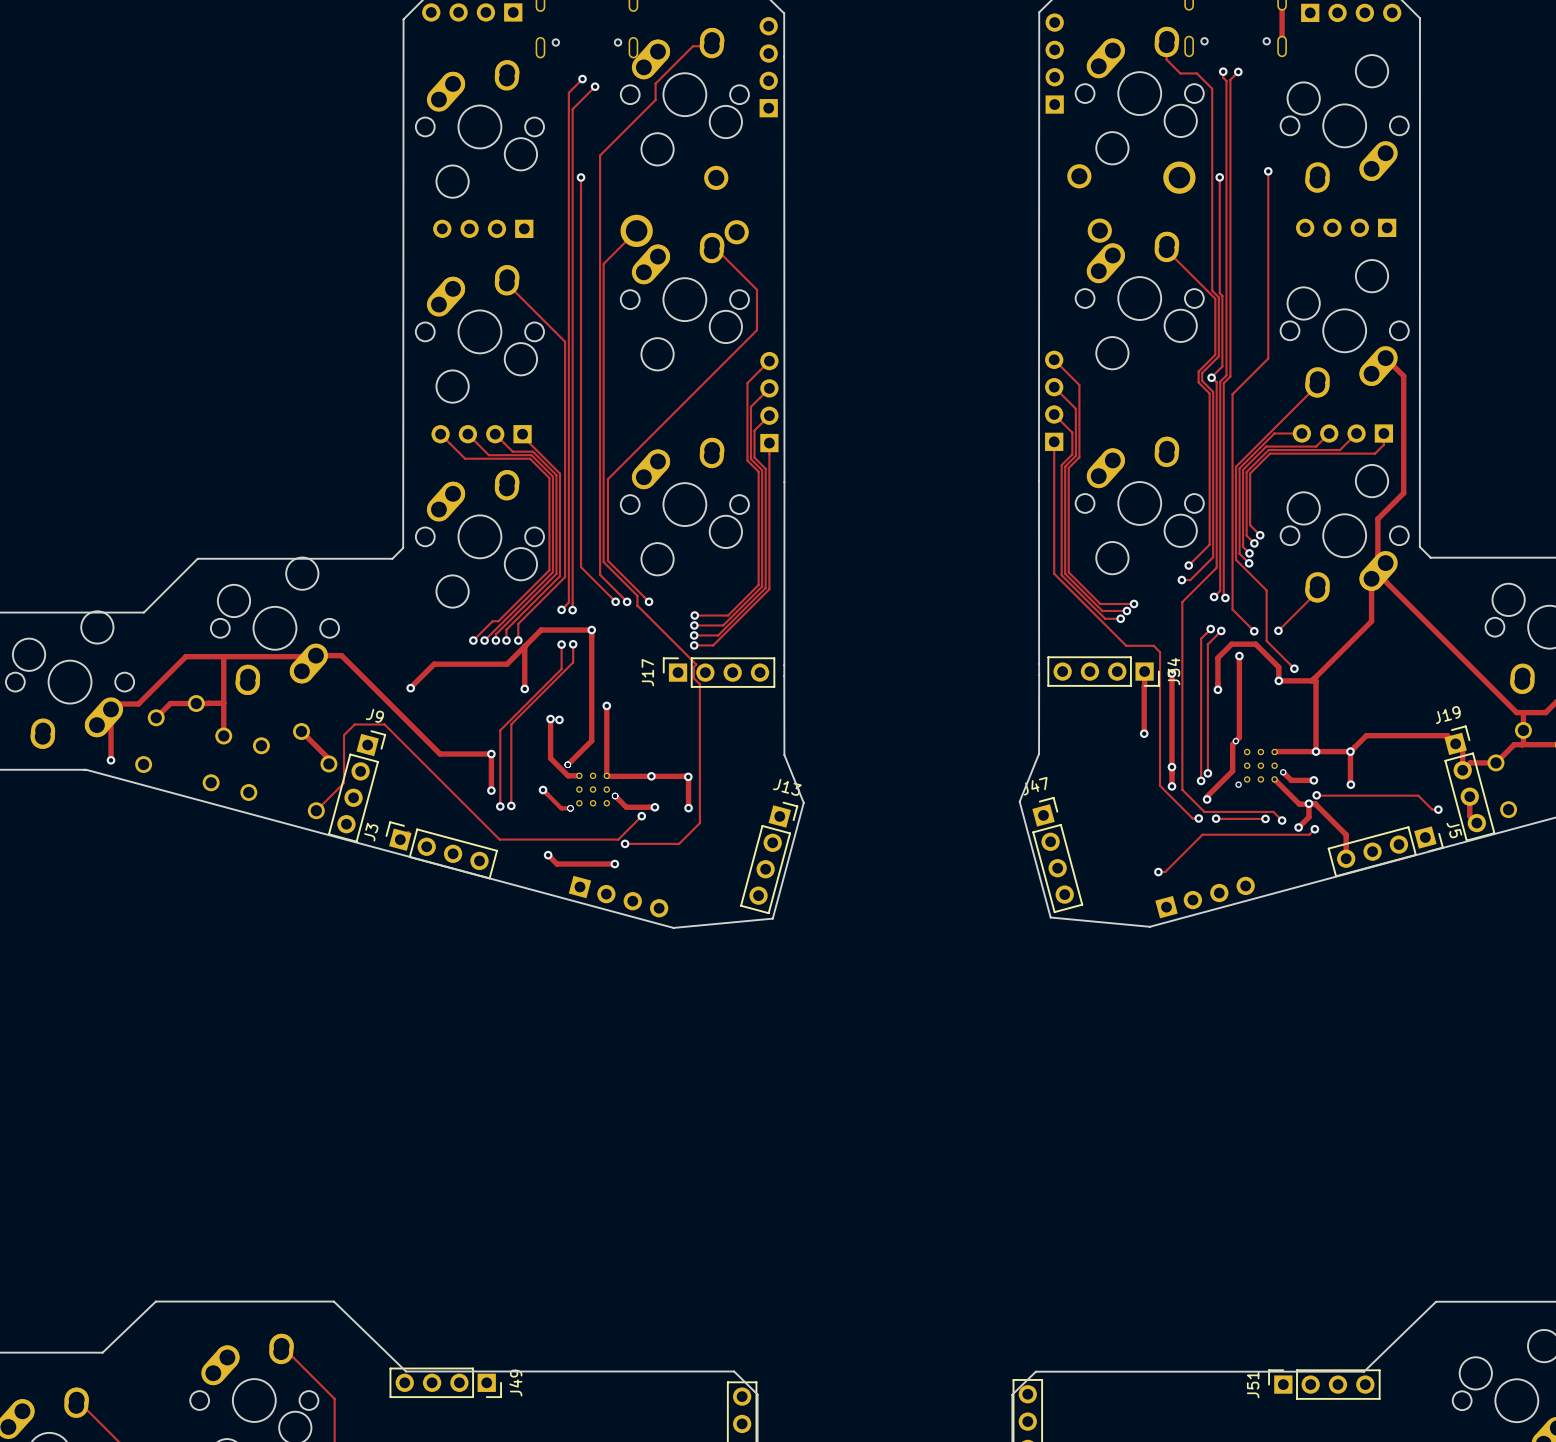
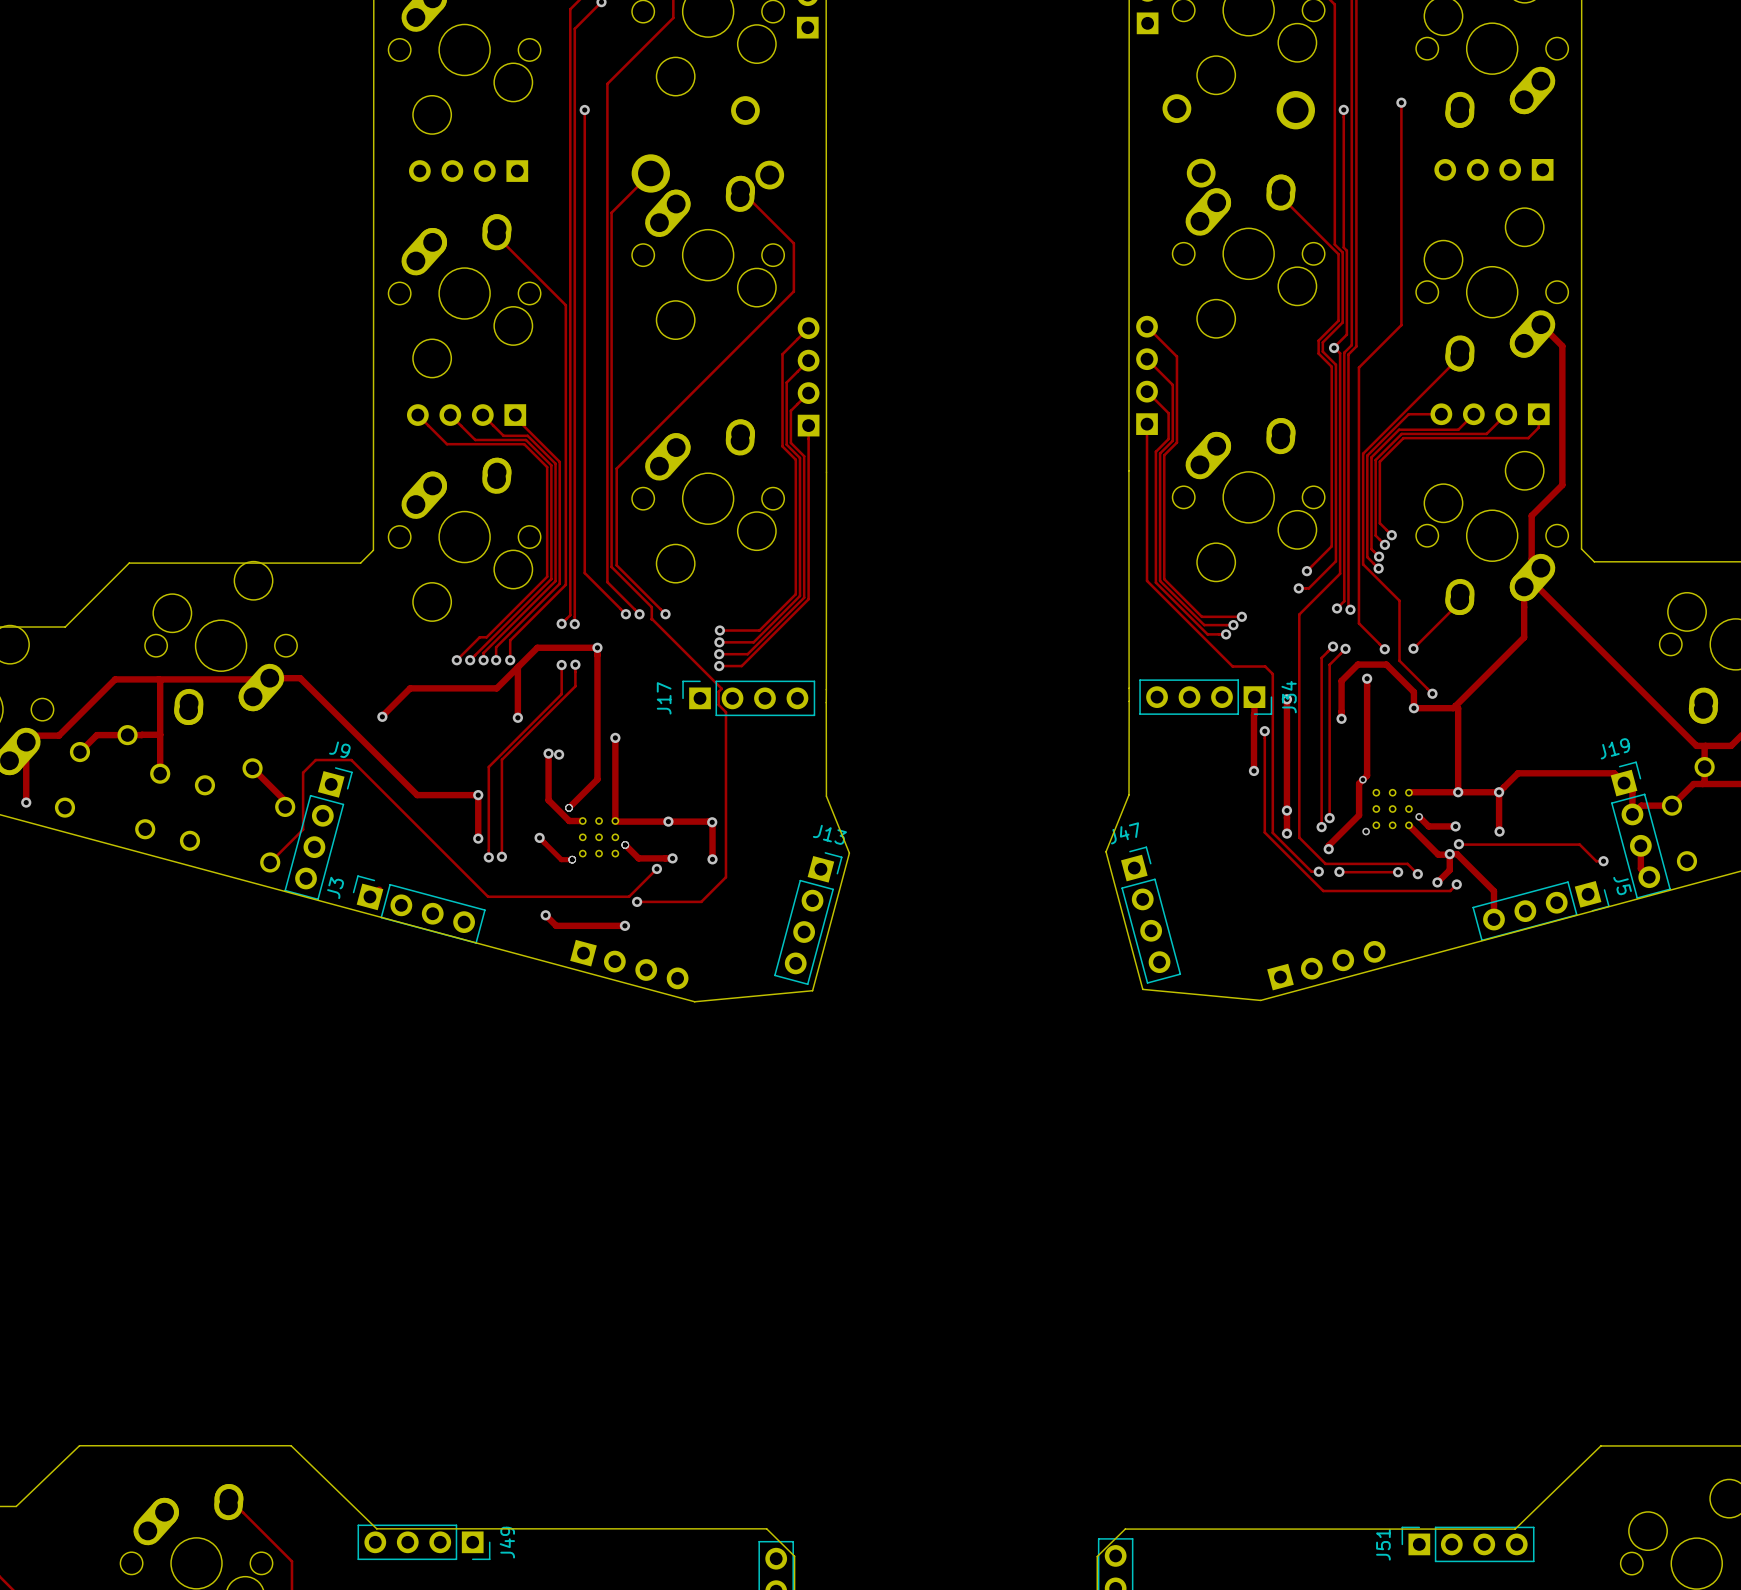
via: none -> (1264, 731)
track: (1202, 834) (1165, 872) (1158, 872) -> (1323, 891) (1264, 832) (1264, 731)
via: (1158, 872) -> none

